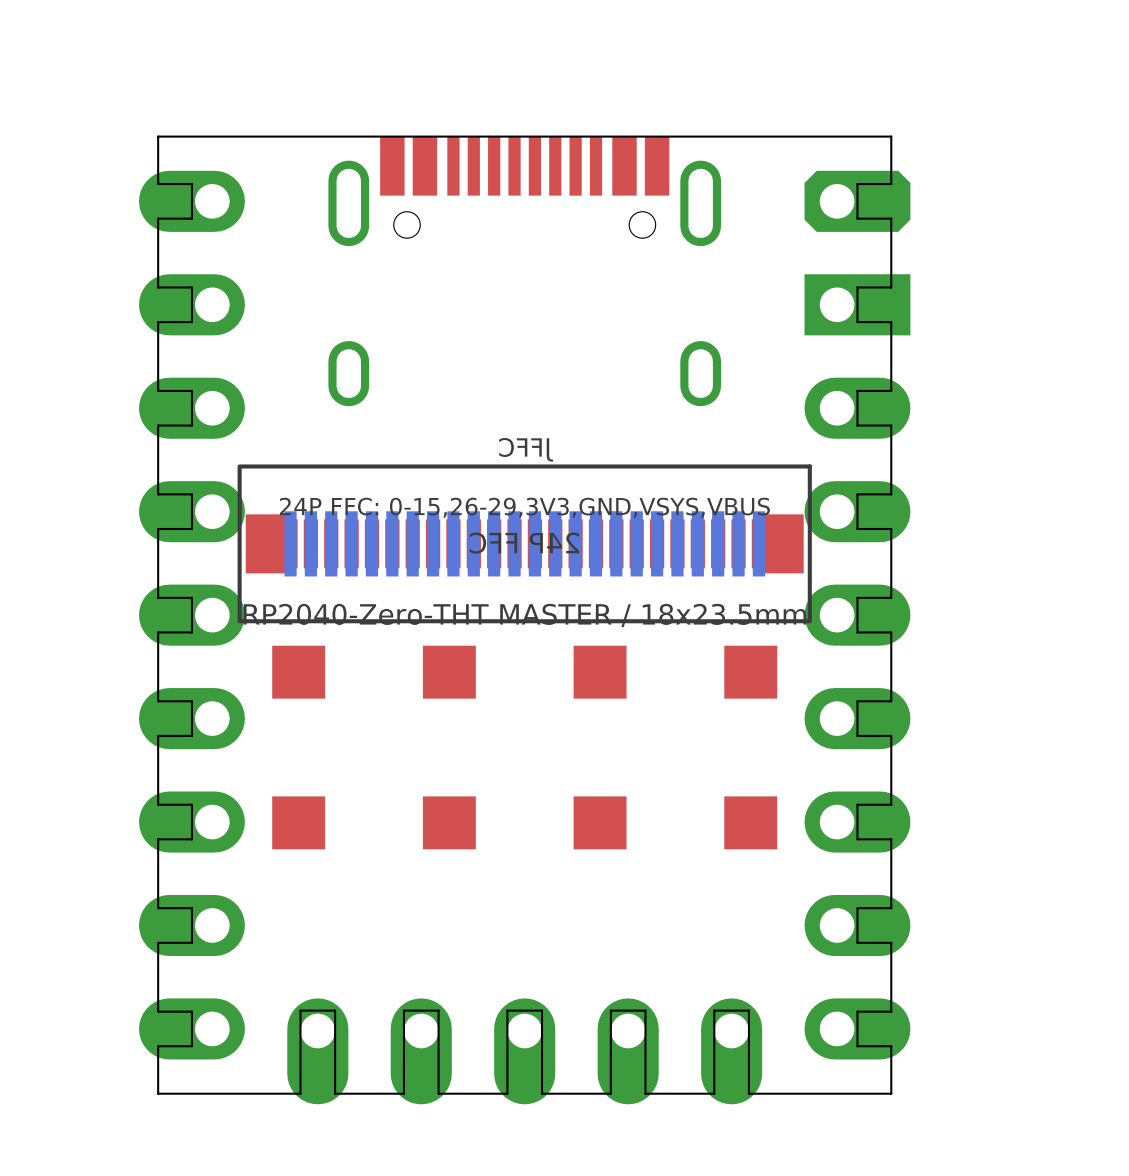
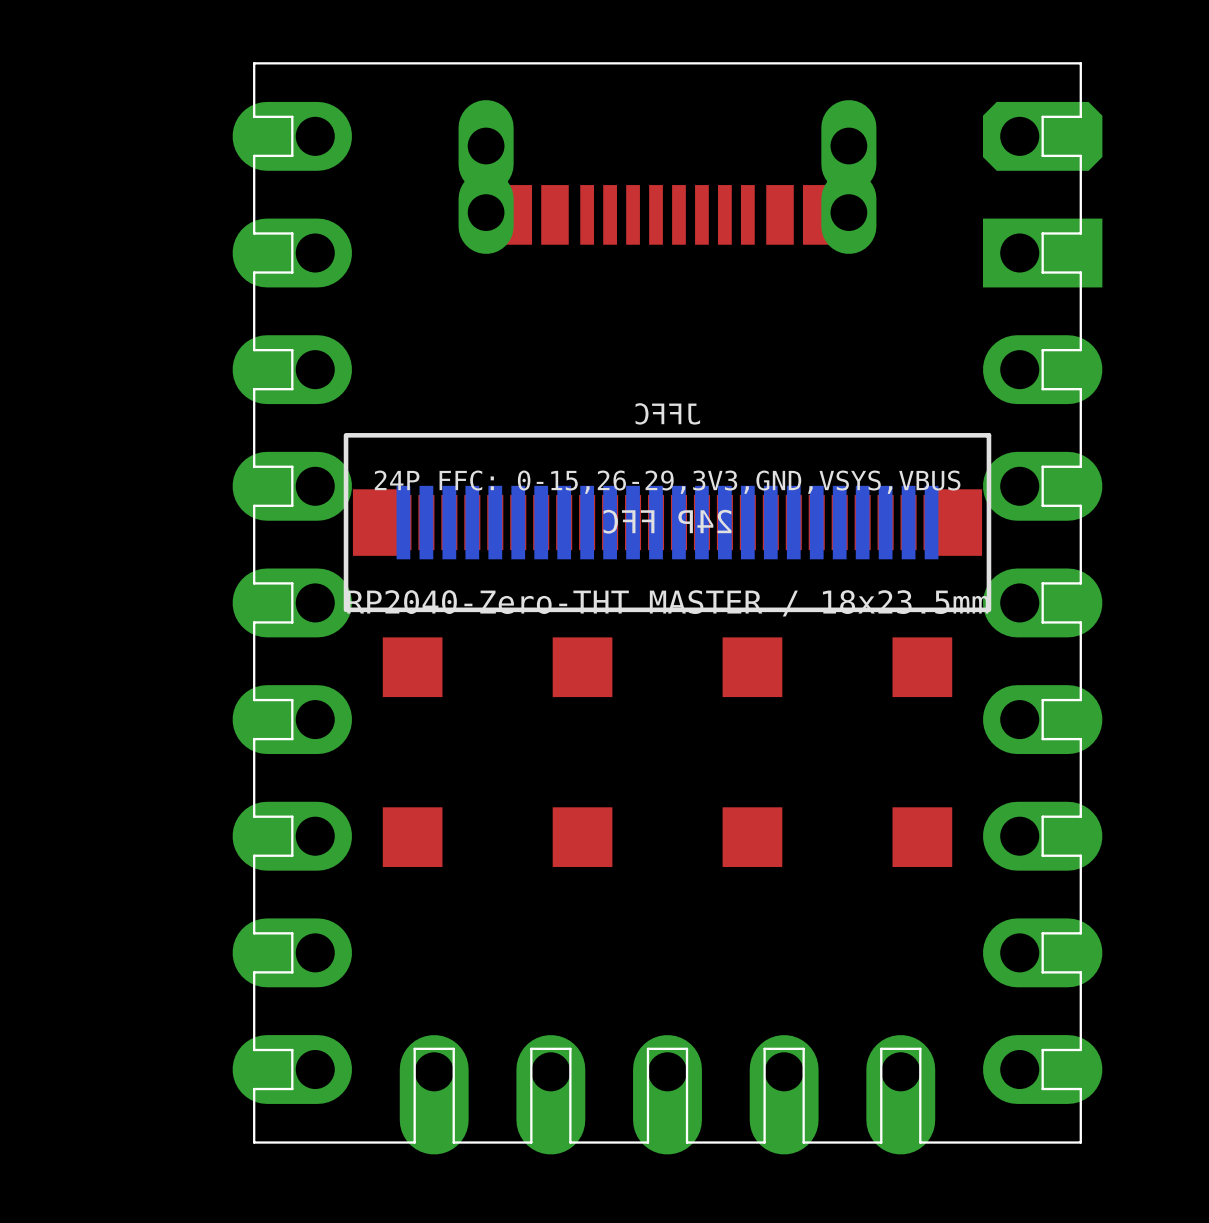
part footprint: [328, 136, 722, 407] -> [458, 100, 877, 254]

